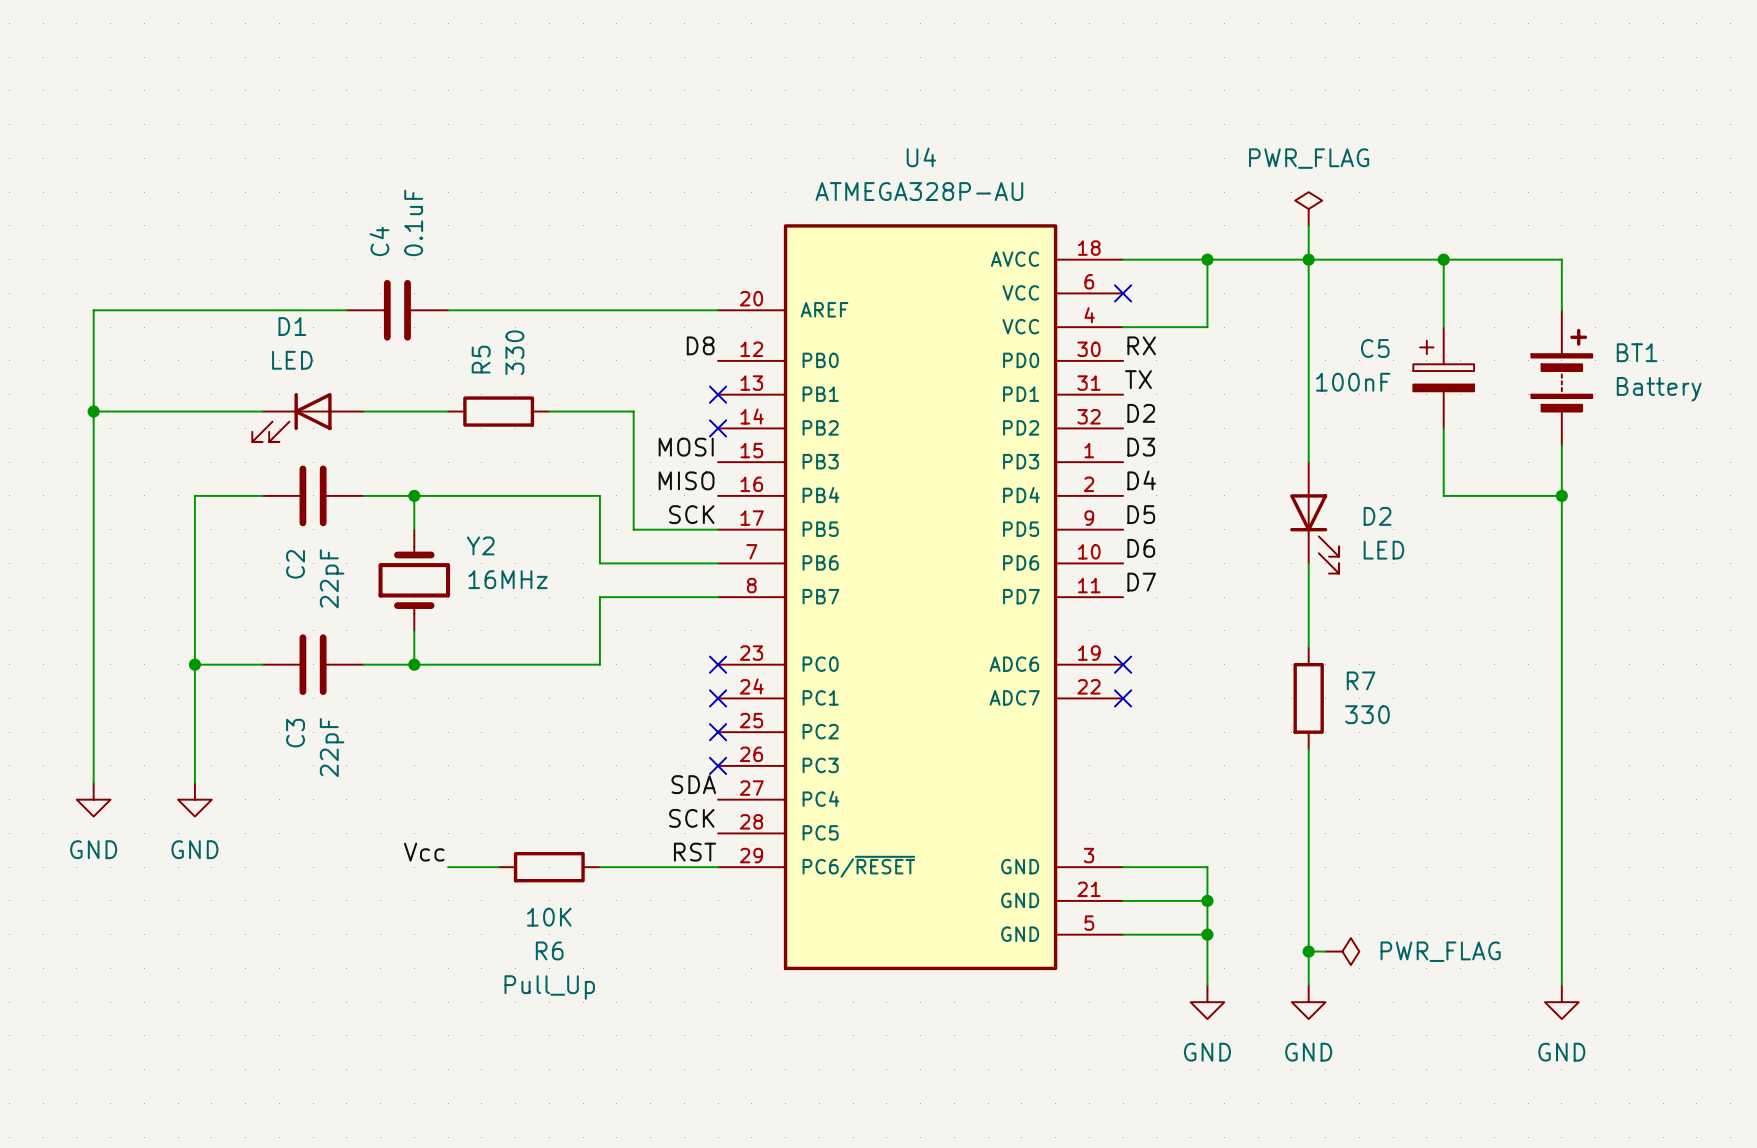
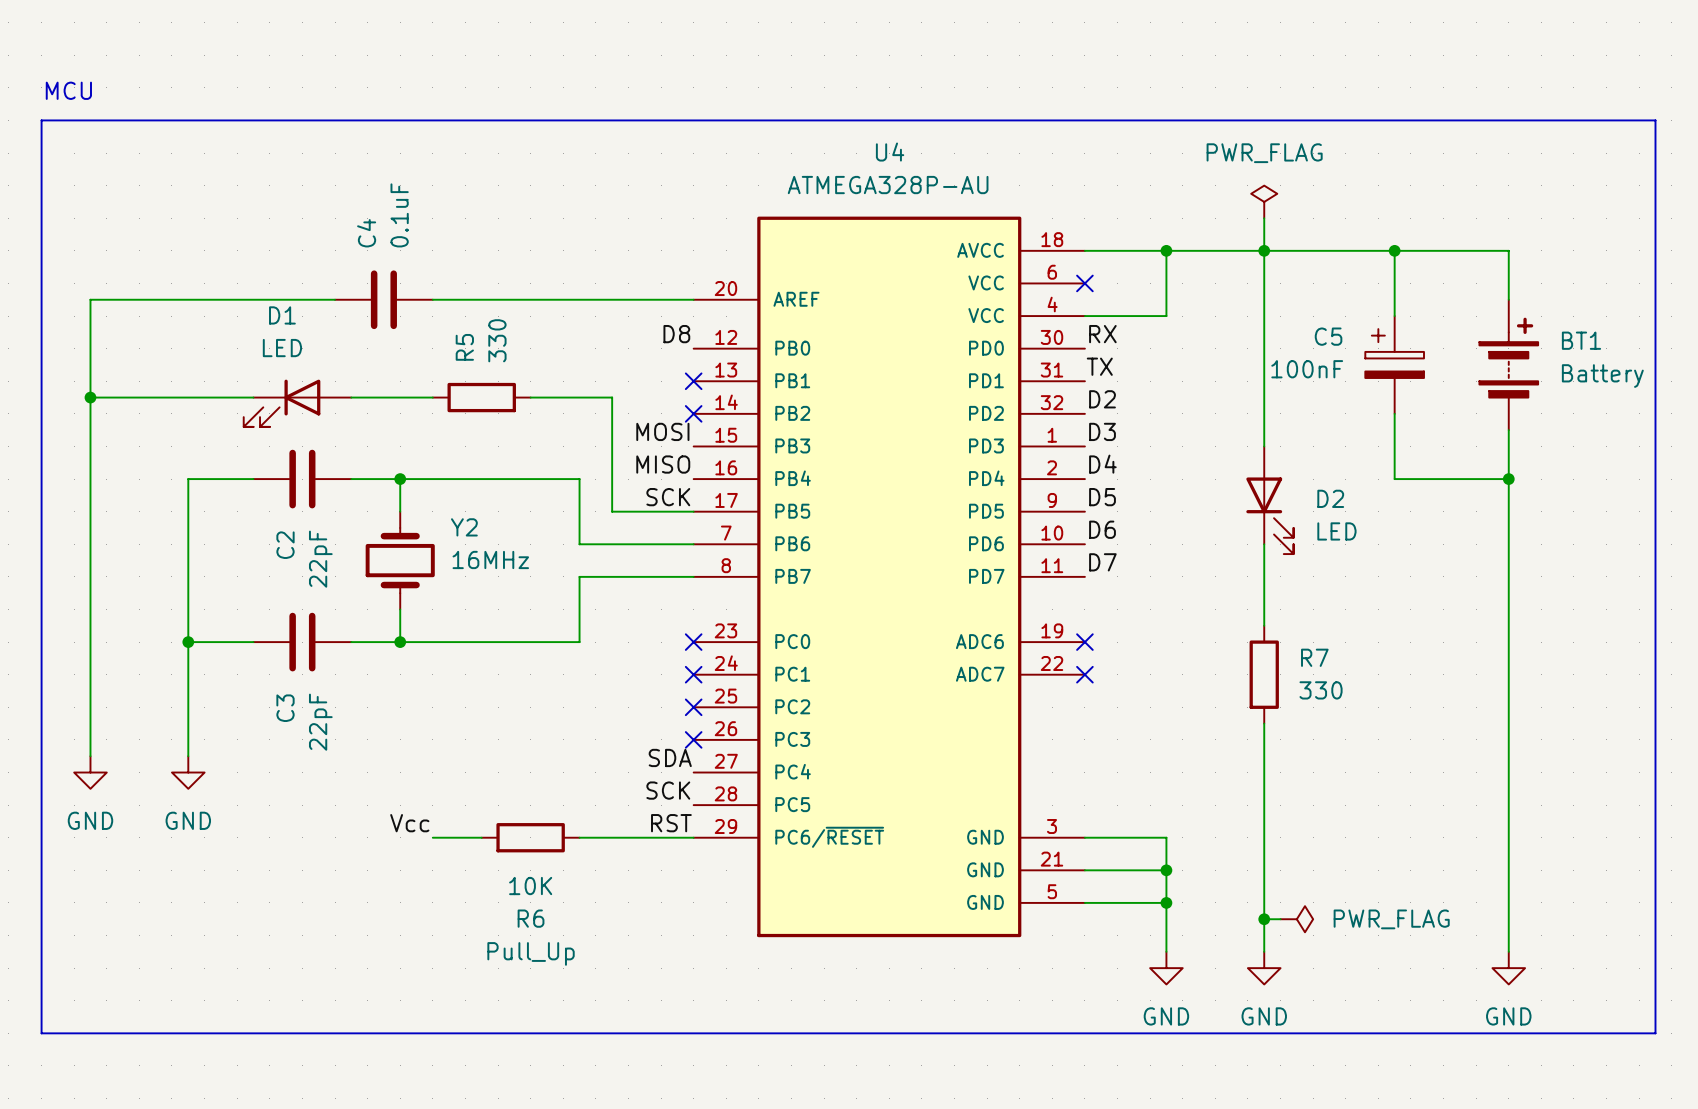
text: none -> MCU (68, 90)
line: none -> (41, 120) (1655, 120) (1655, 1033) (41, 1033) (41, 120)

